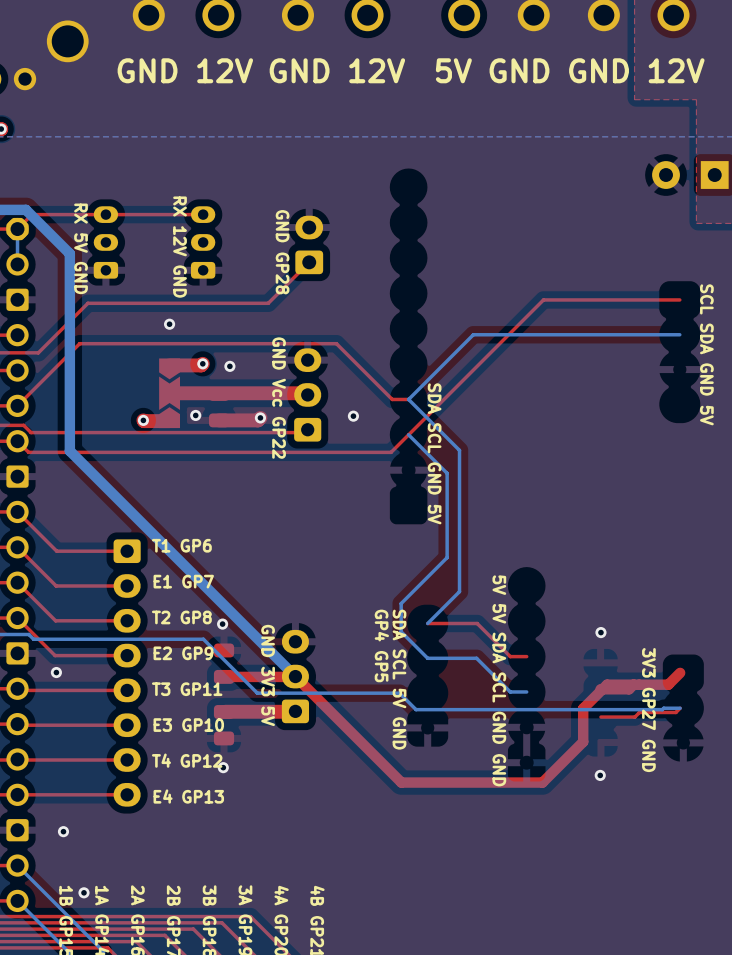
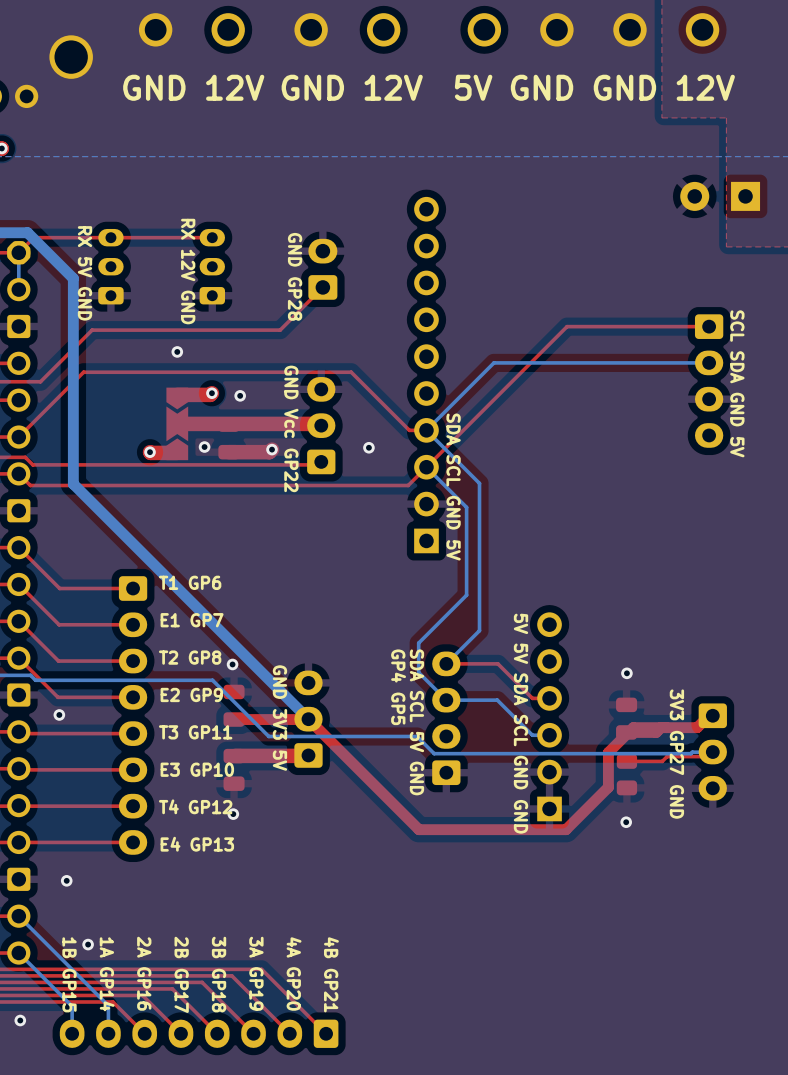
part: none -> (426, 375)
part: none -> (709, 381)
part: none -> (549, 716)
part: none -> (446, 718)
part: none -> (626, 718)
part: none -> (712, 752)
part: none -> (626, 774)

